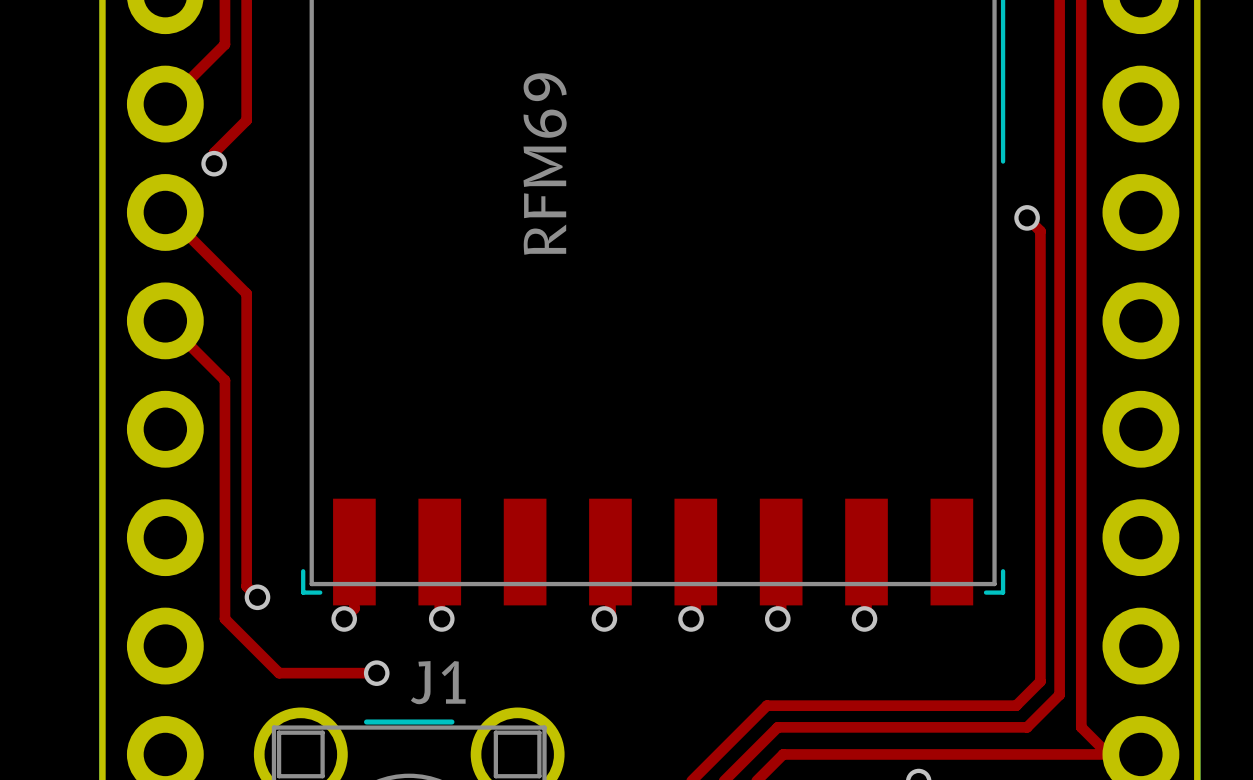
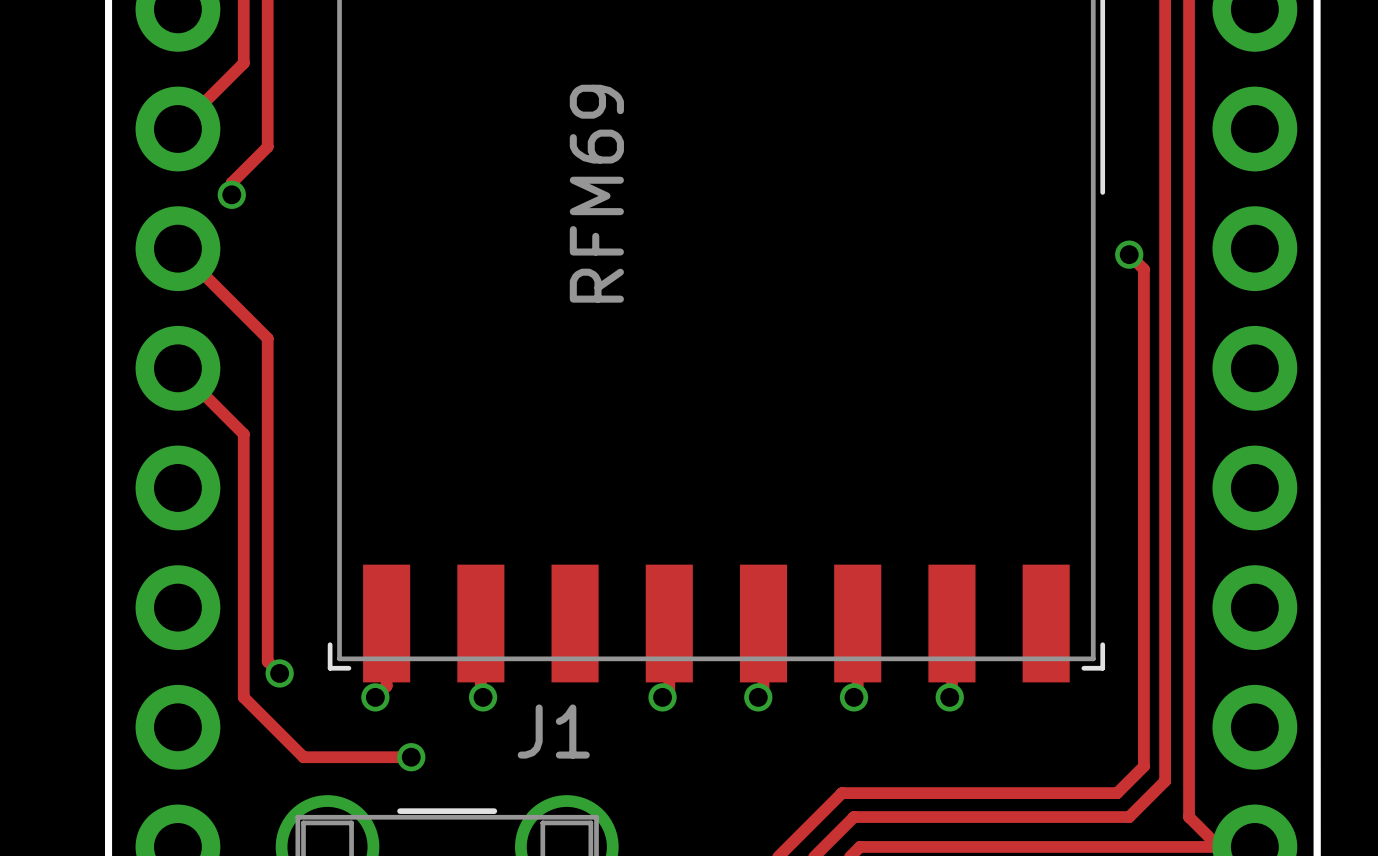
J1 name position: J1 (438, 682) -> J1 (553, 731)

